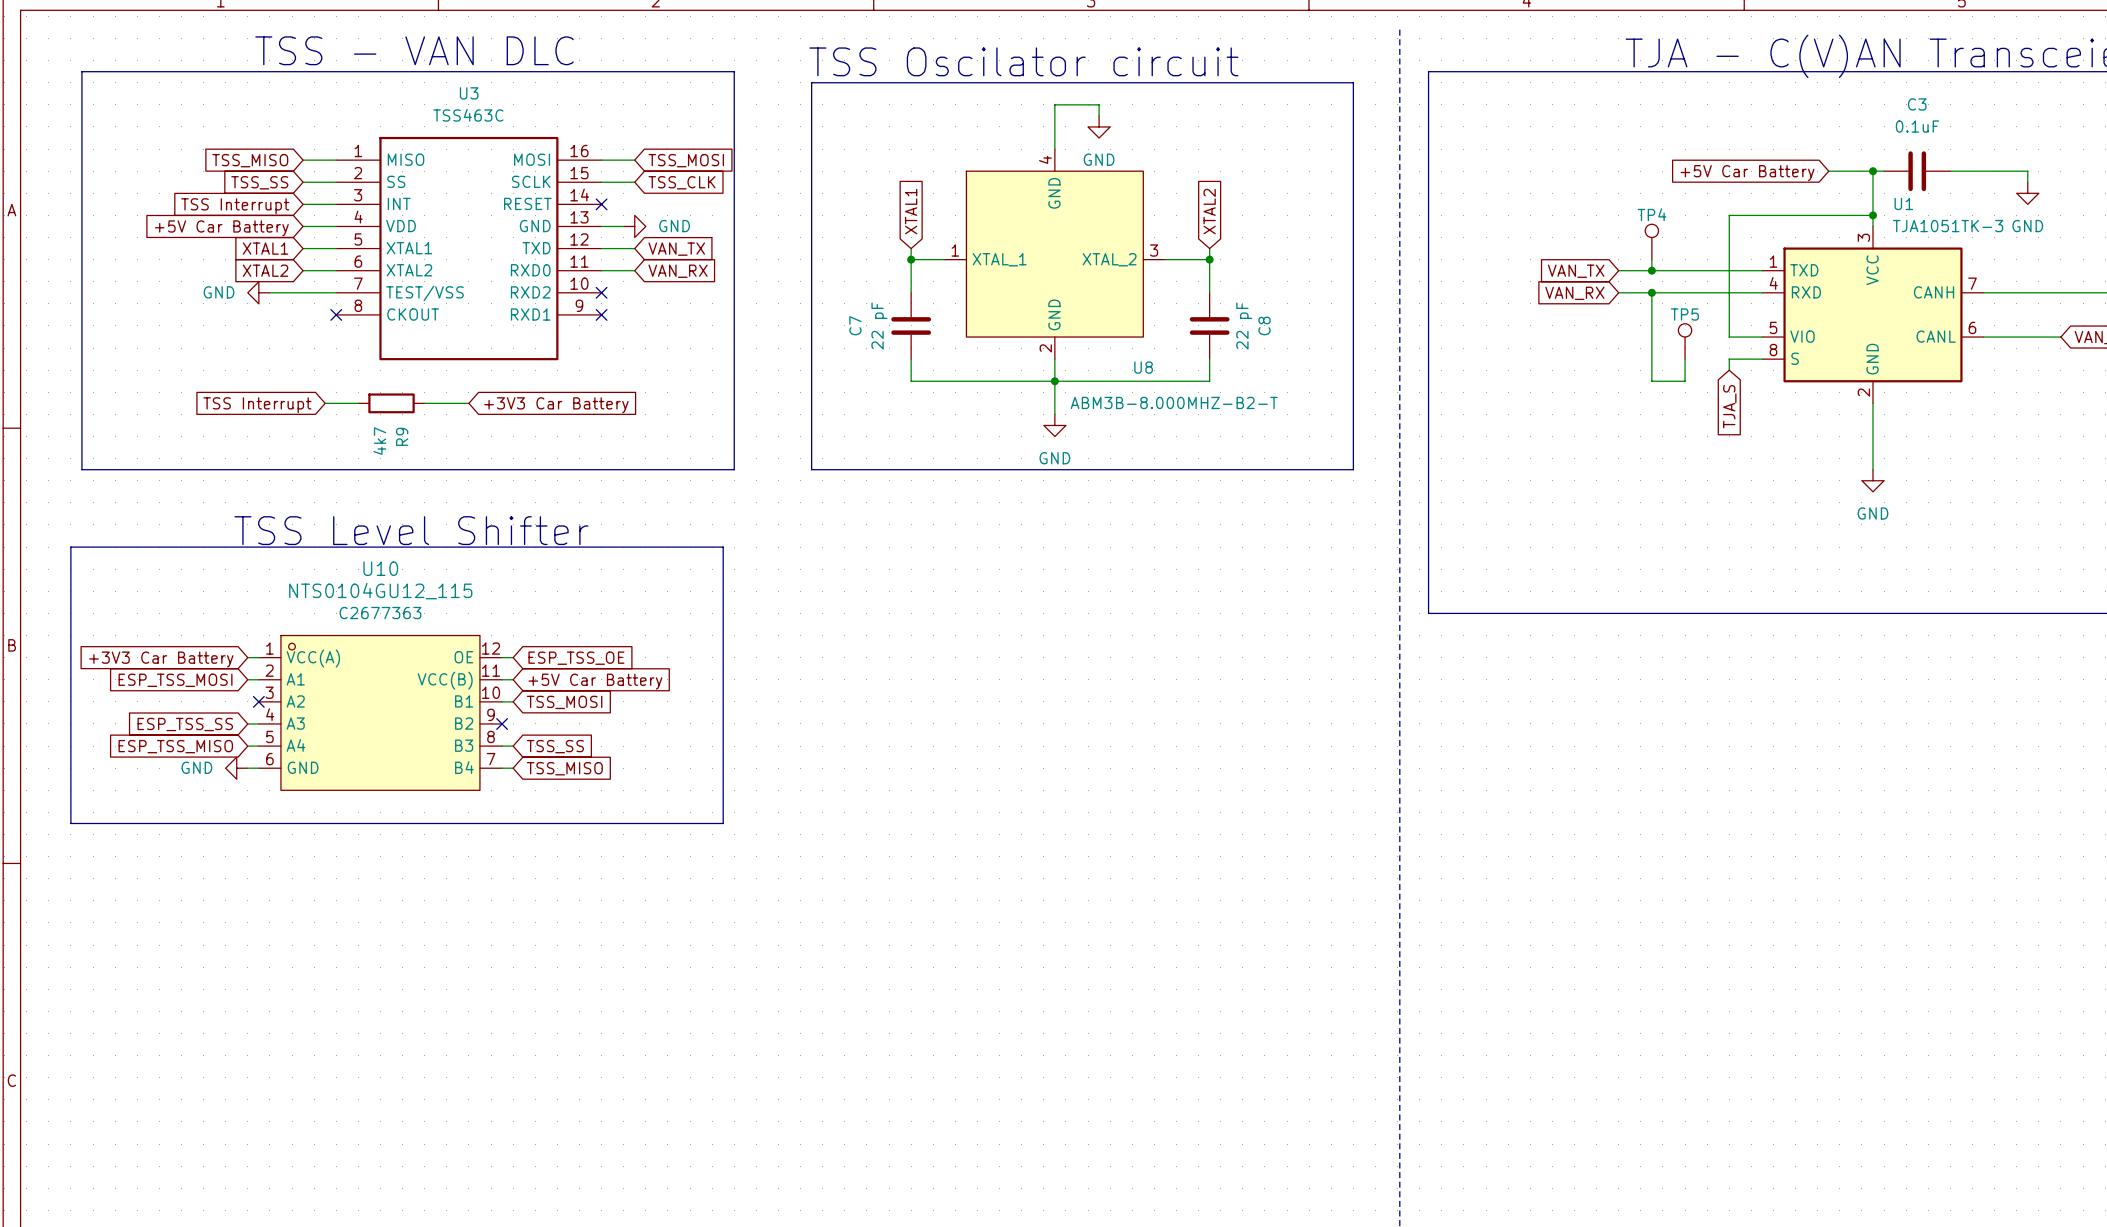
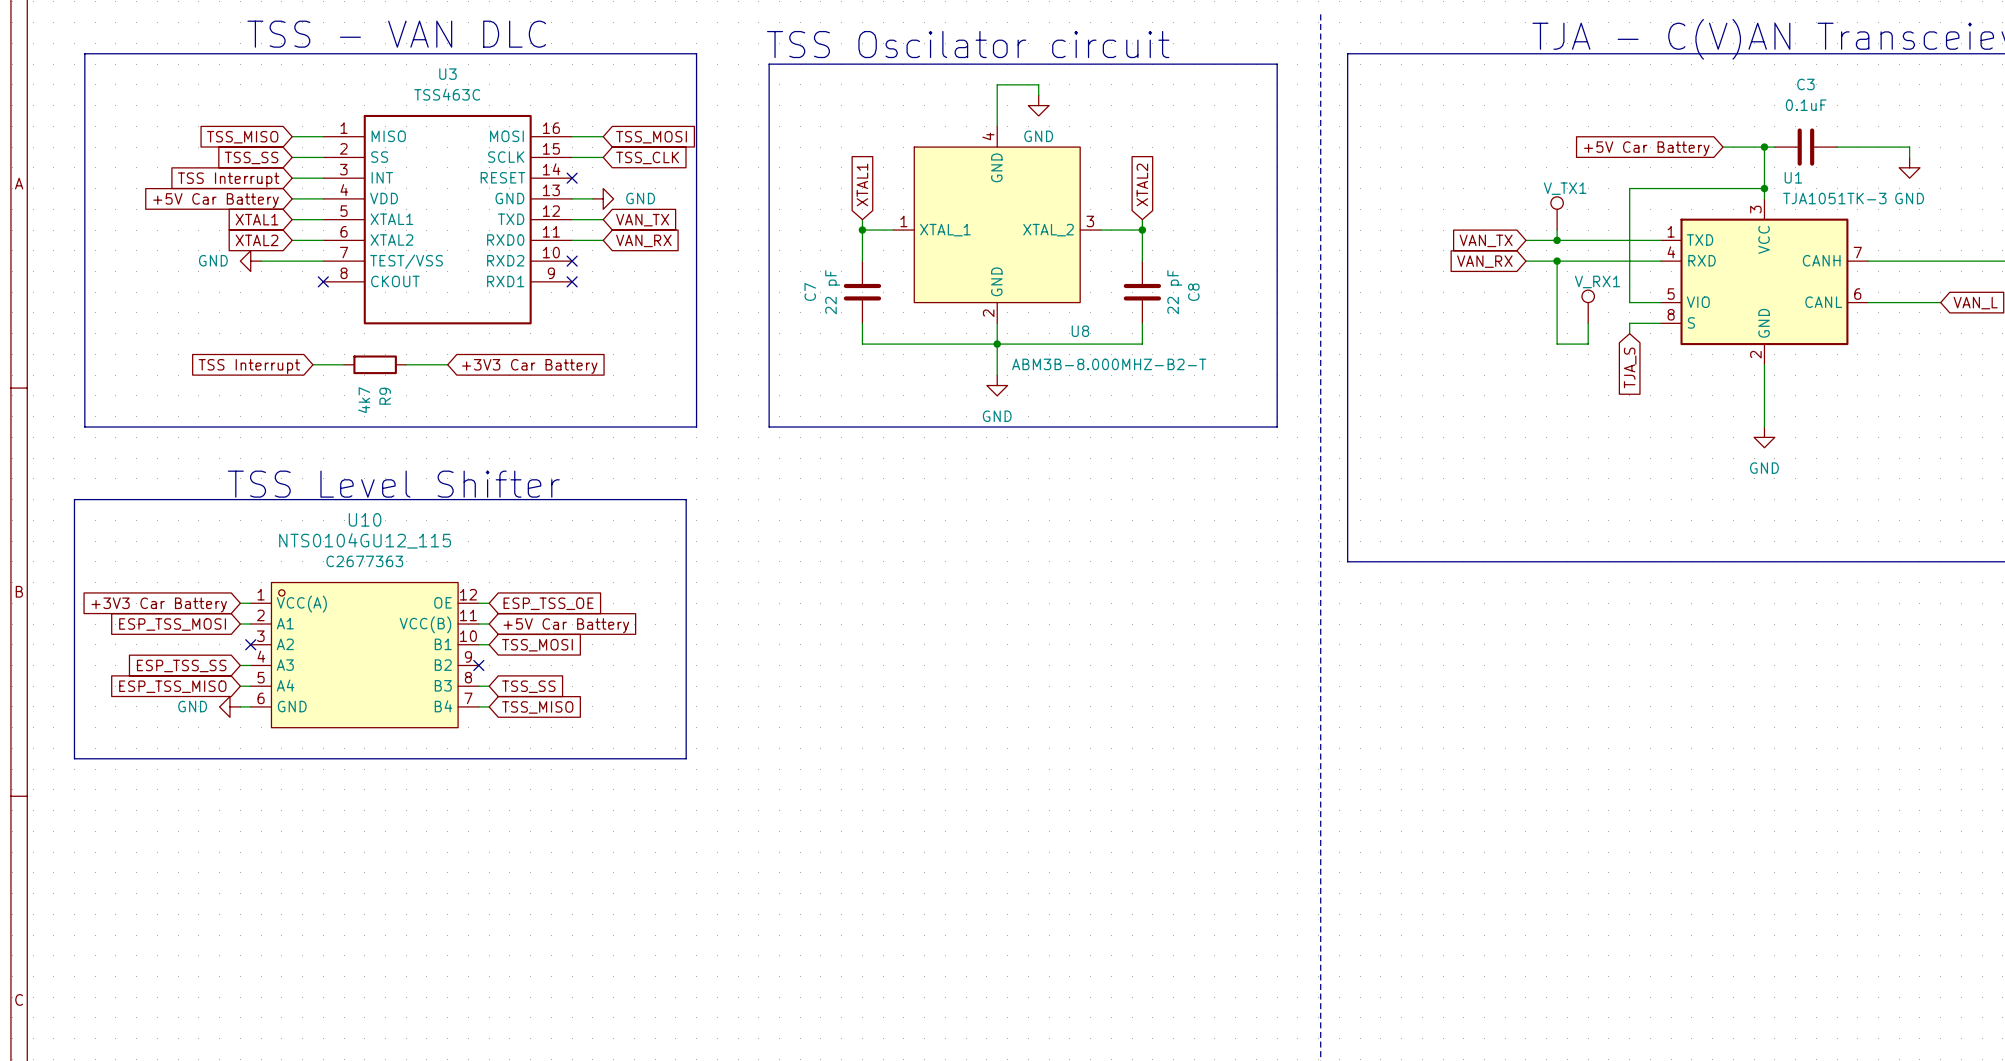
TP4 name: TP4 (1652, 214) -> V_TX1 (1565, 188)
TP5 name: TP5 (1684, 314) -> V_RX1 (1597, 281)

